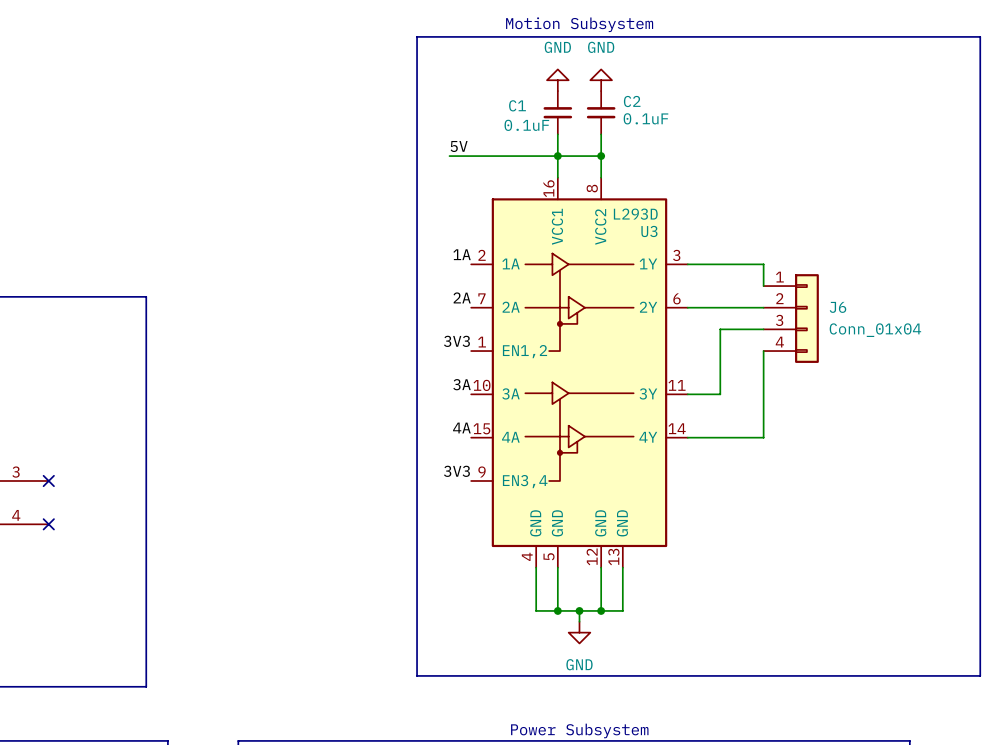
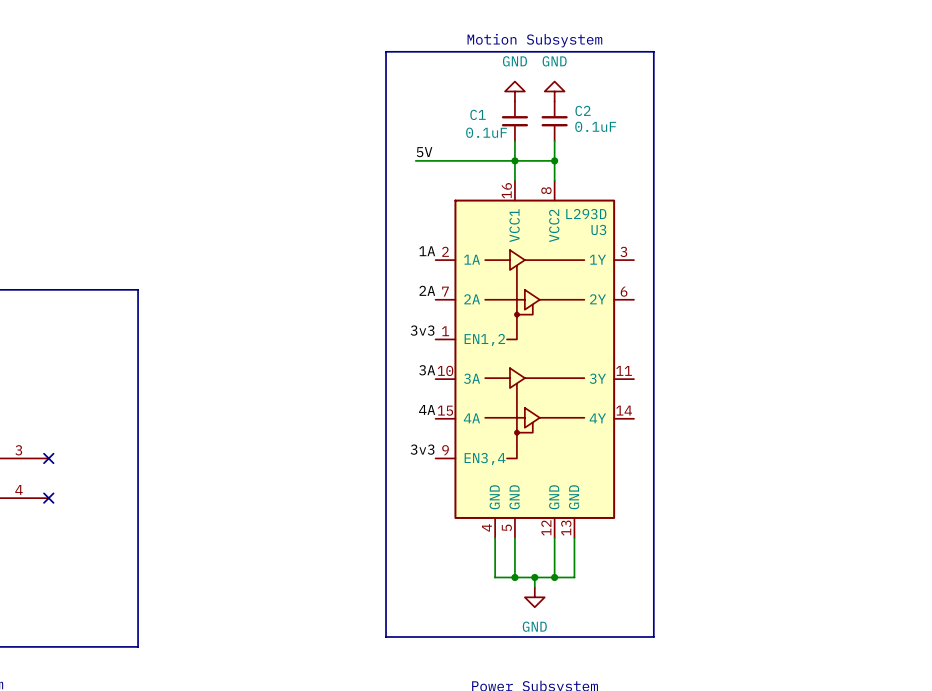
line: (709, 36) (980, 36) (980, 675) (709, 675) -> (653, 51) (653, 636)
wire: (687, 264) (763, 264) (763, 286) -> none
wire: (687, 307) (763, 307) -> none
J6: Conn_01x04 (791, 318) -> none
wire: (763, 329) (720, 329) (720, 394) (687, 394) -> none
label: 3V3 (456, 341) -> 3v3 (422, 330)
wire: (763, 351) (763, 437) (687, 437) -> none
label: 3V3 (456, 471) -> 3v3 (422, 449)

